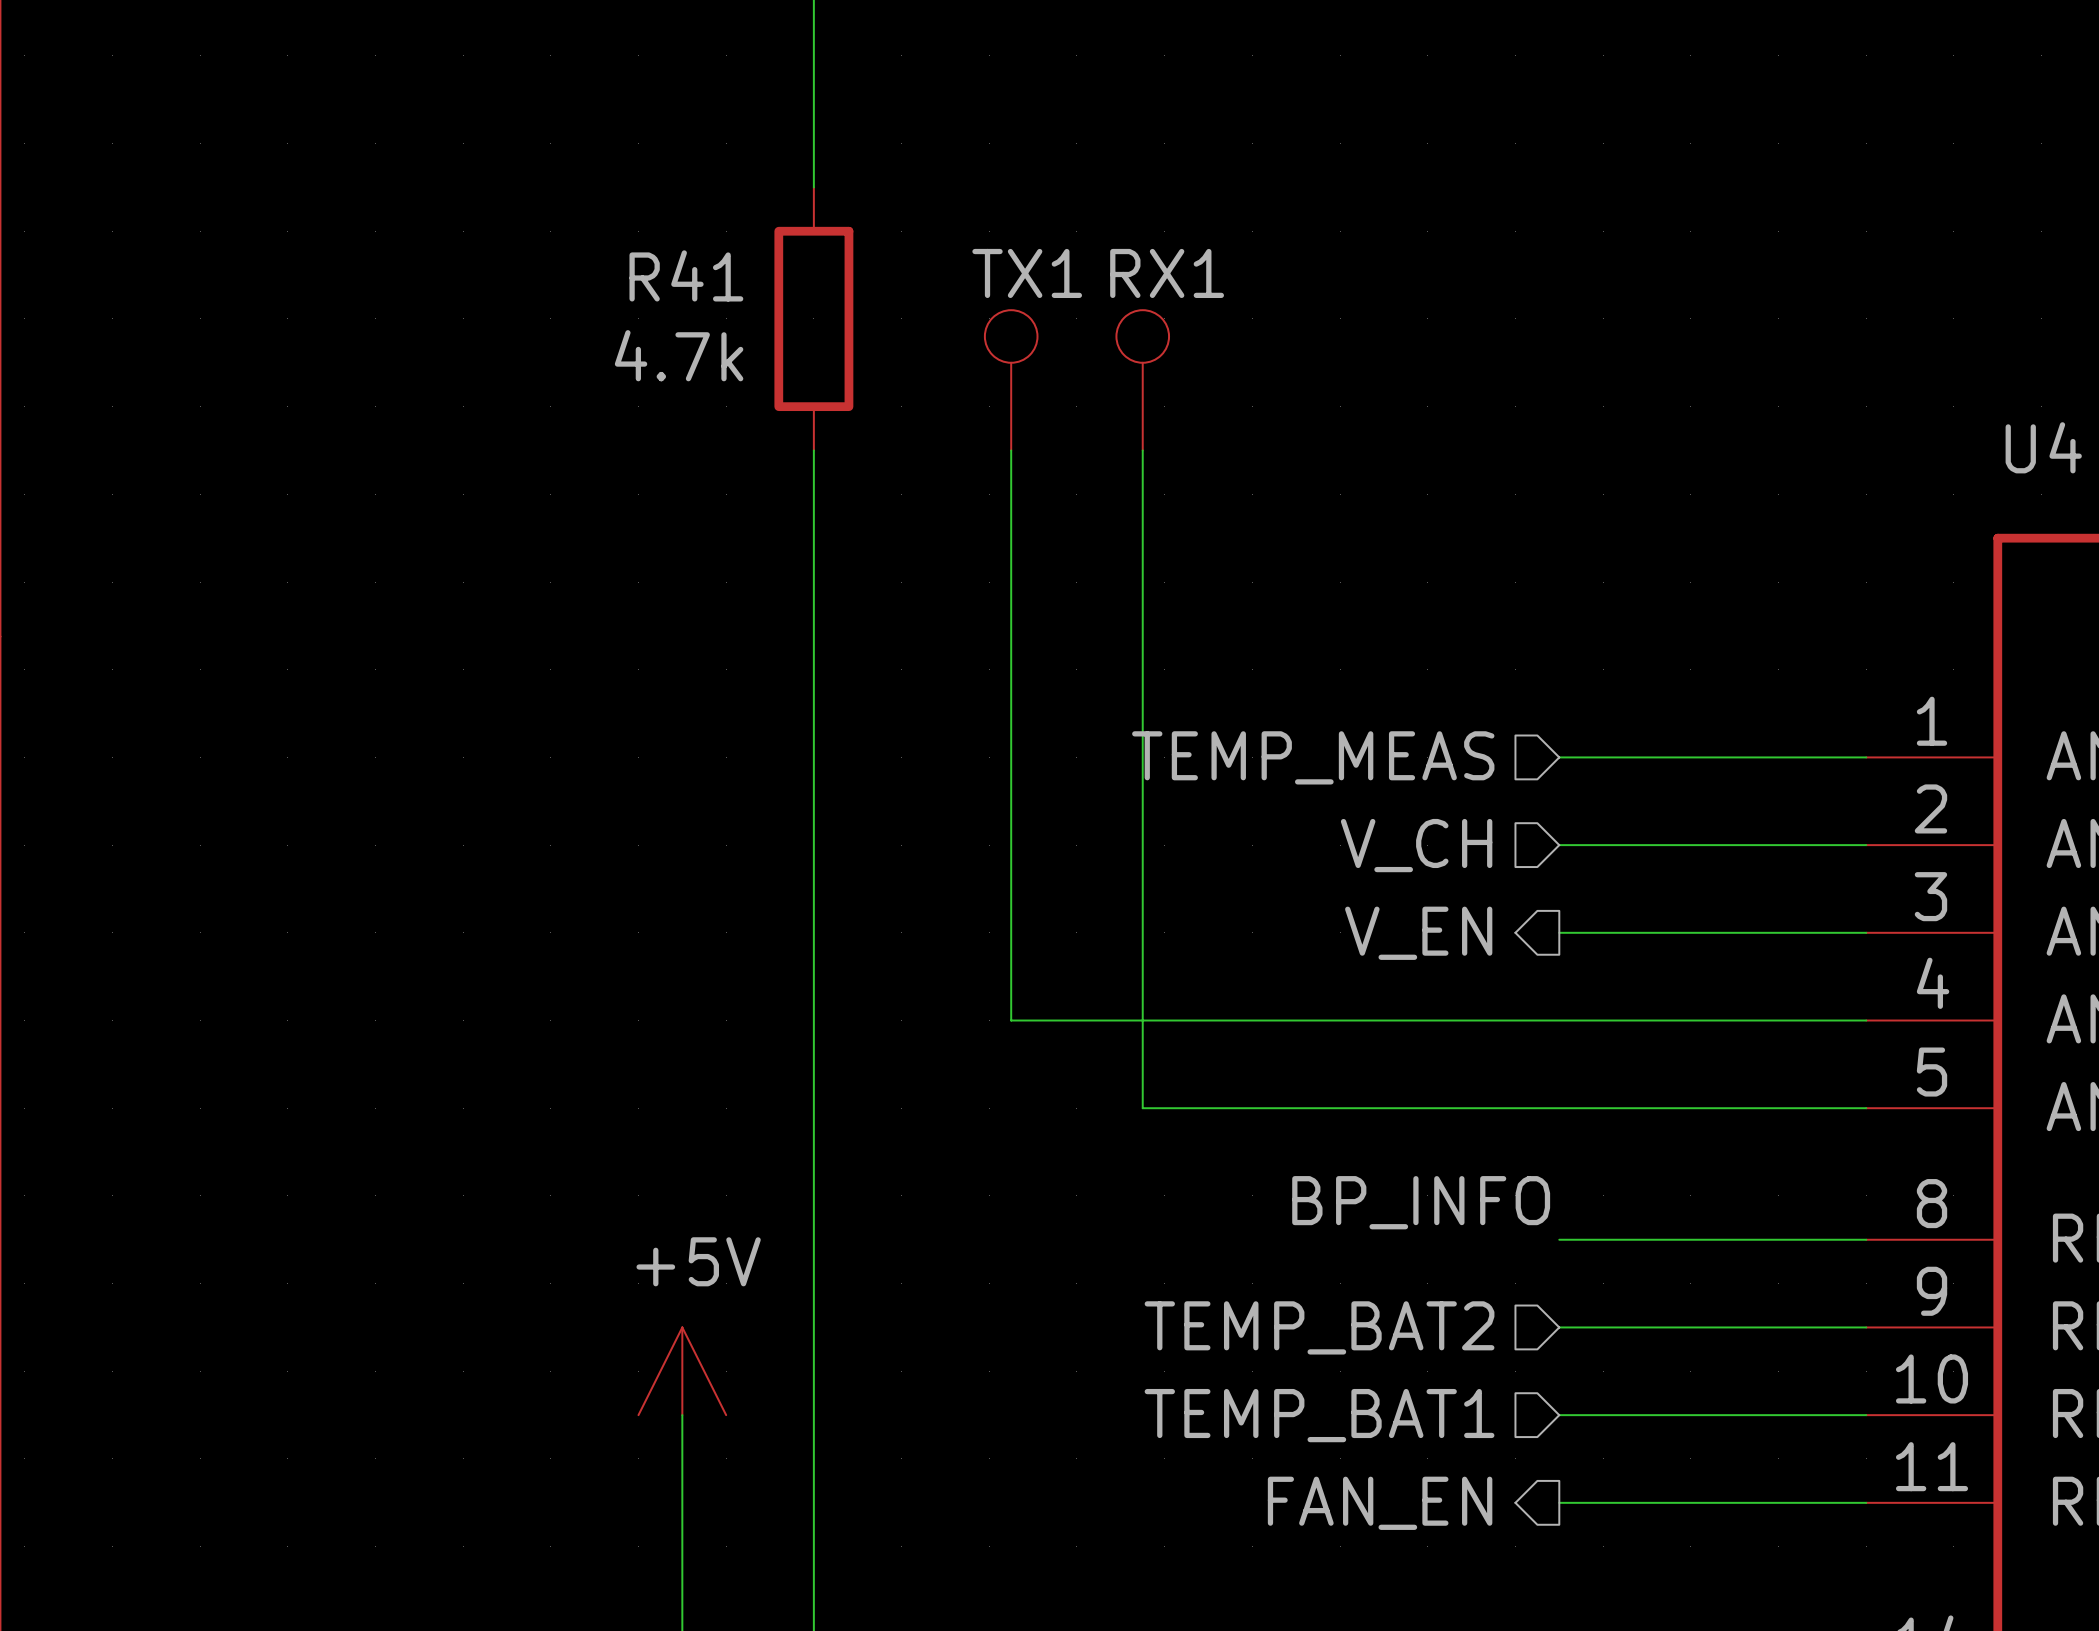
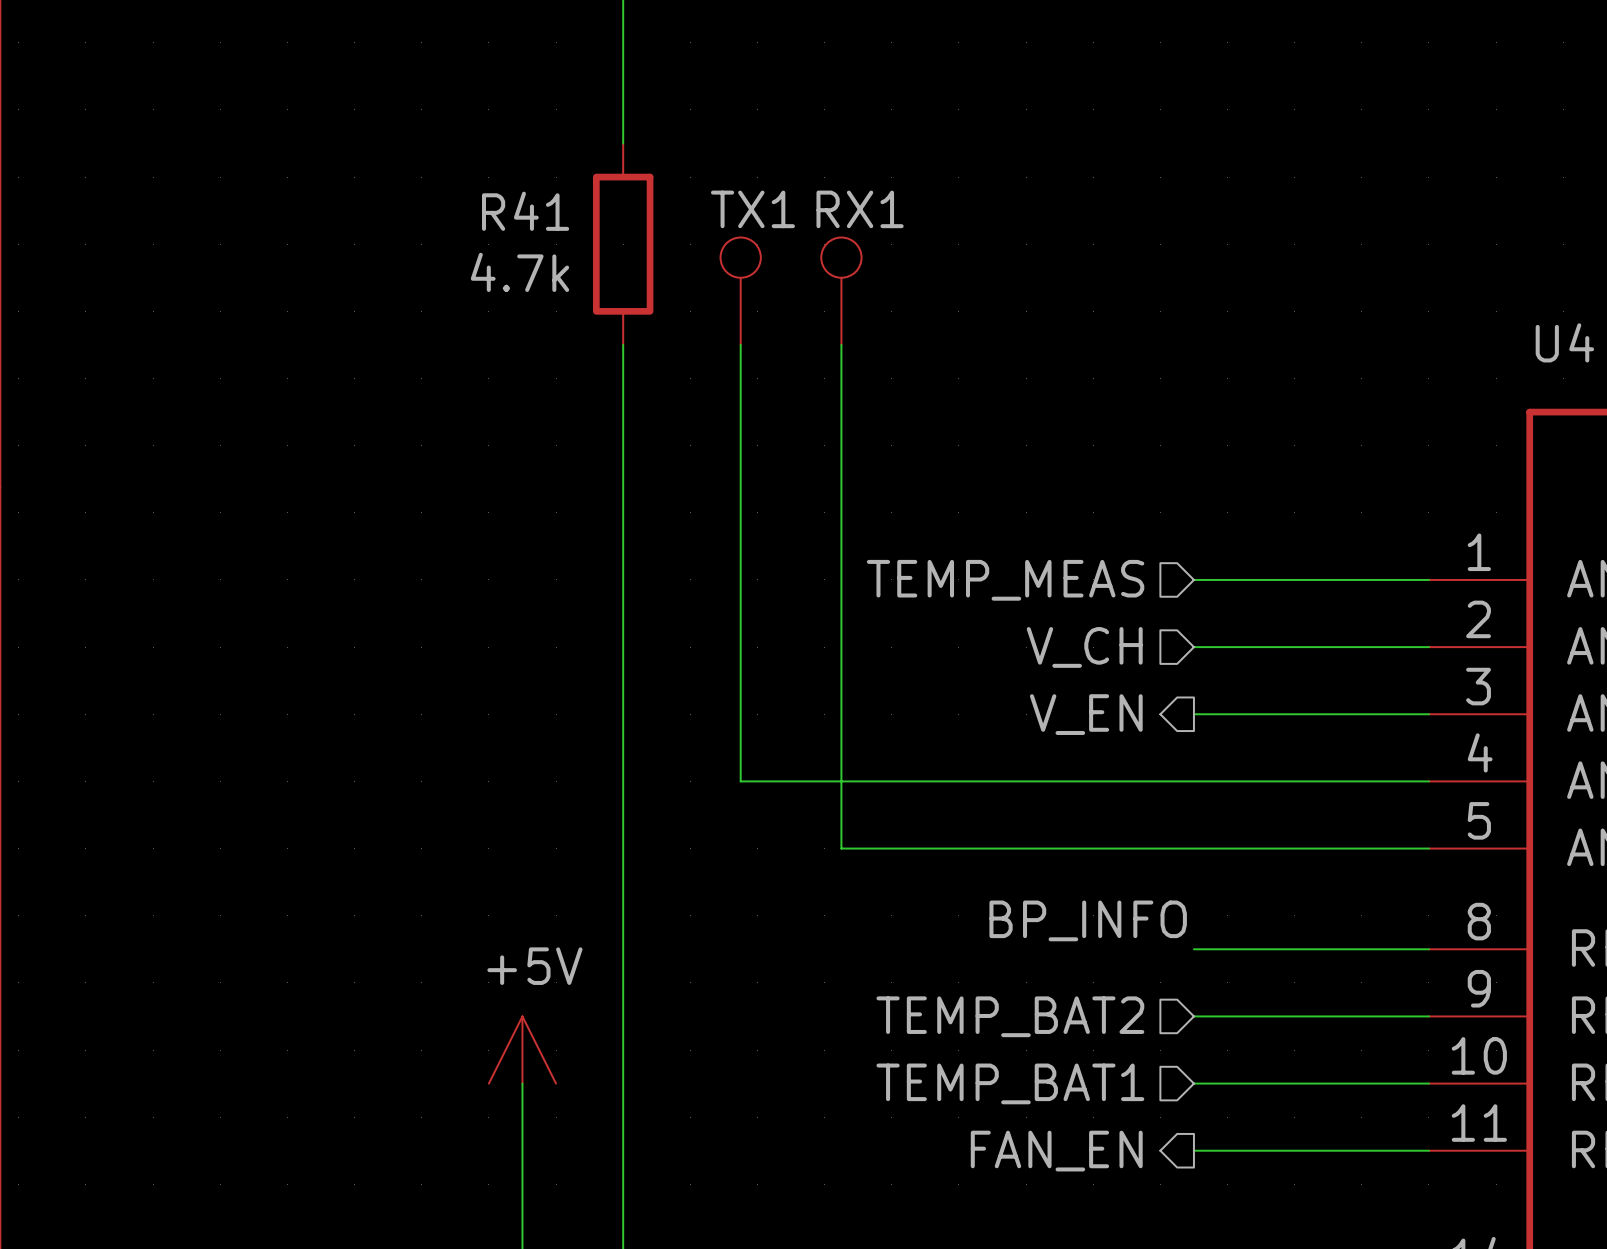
TX1 position: (1011, 380) -> (740, 291)
RX1 position: (1142, 380) -> (841, 291)
wire: (1011, 450) (1011, 1020) -> (740, 344) (740, 781) (774, 781)
wire: (1142, 450) (1142, 1108) -> (841, 344) (841, 848) (874, 848)

